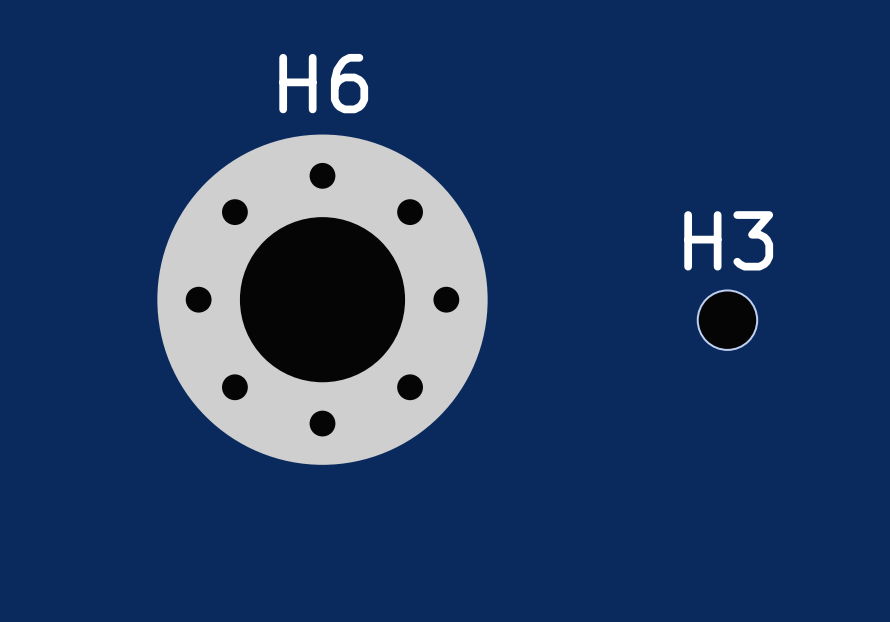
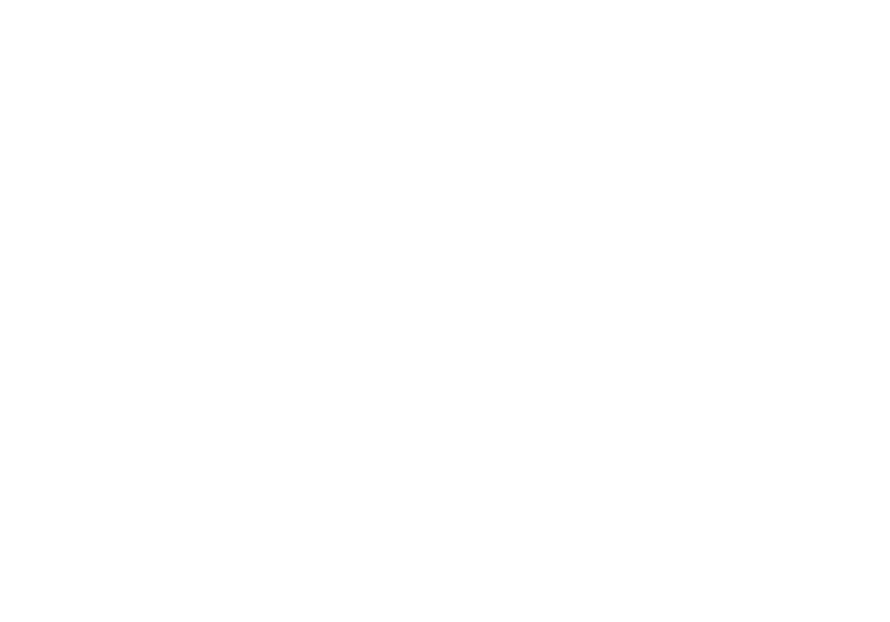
H6: (322, 299) -> none
H3: (727, 320) -> none

